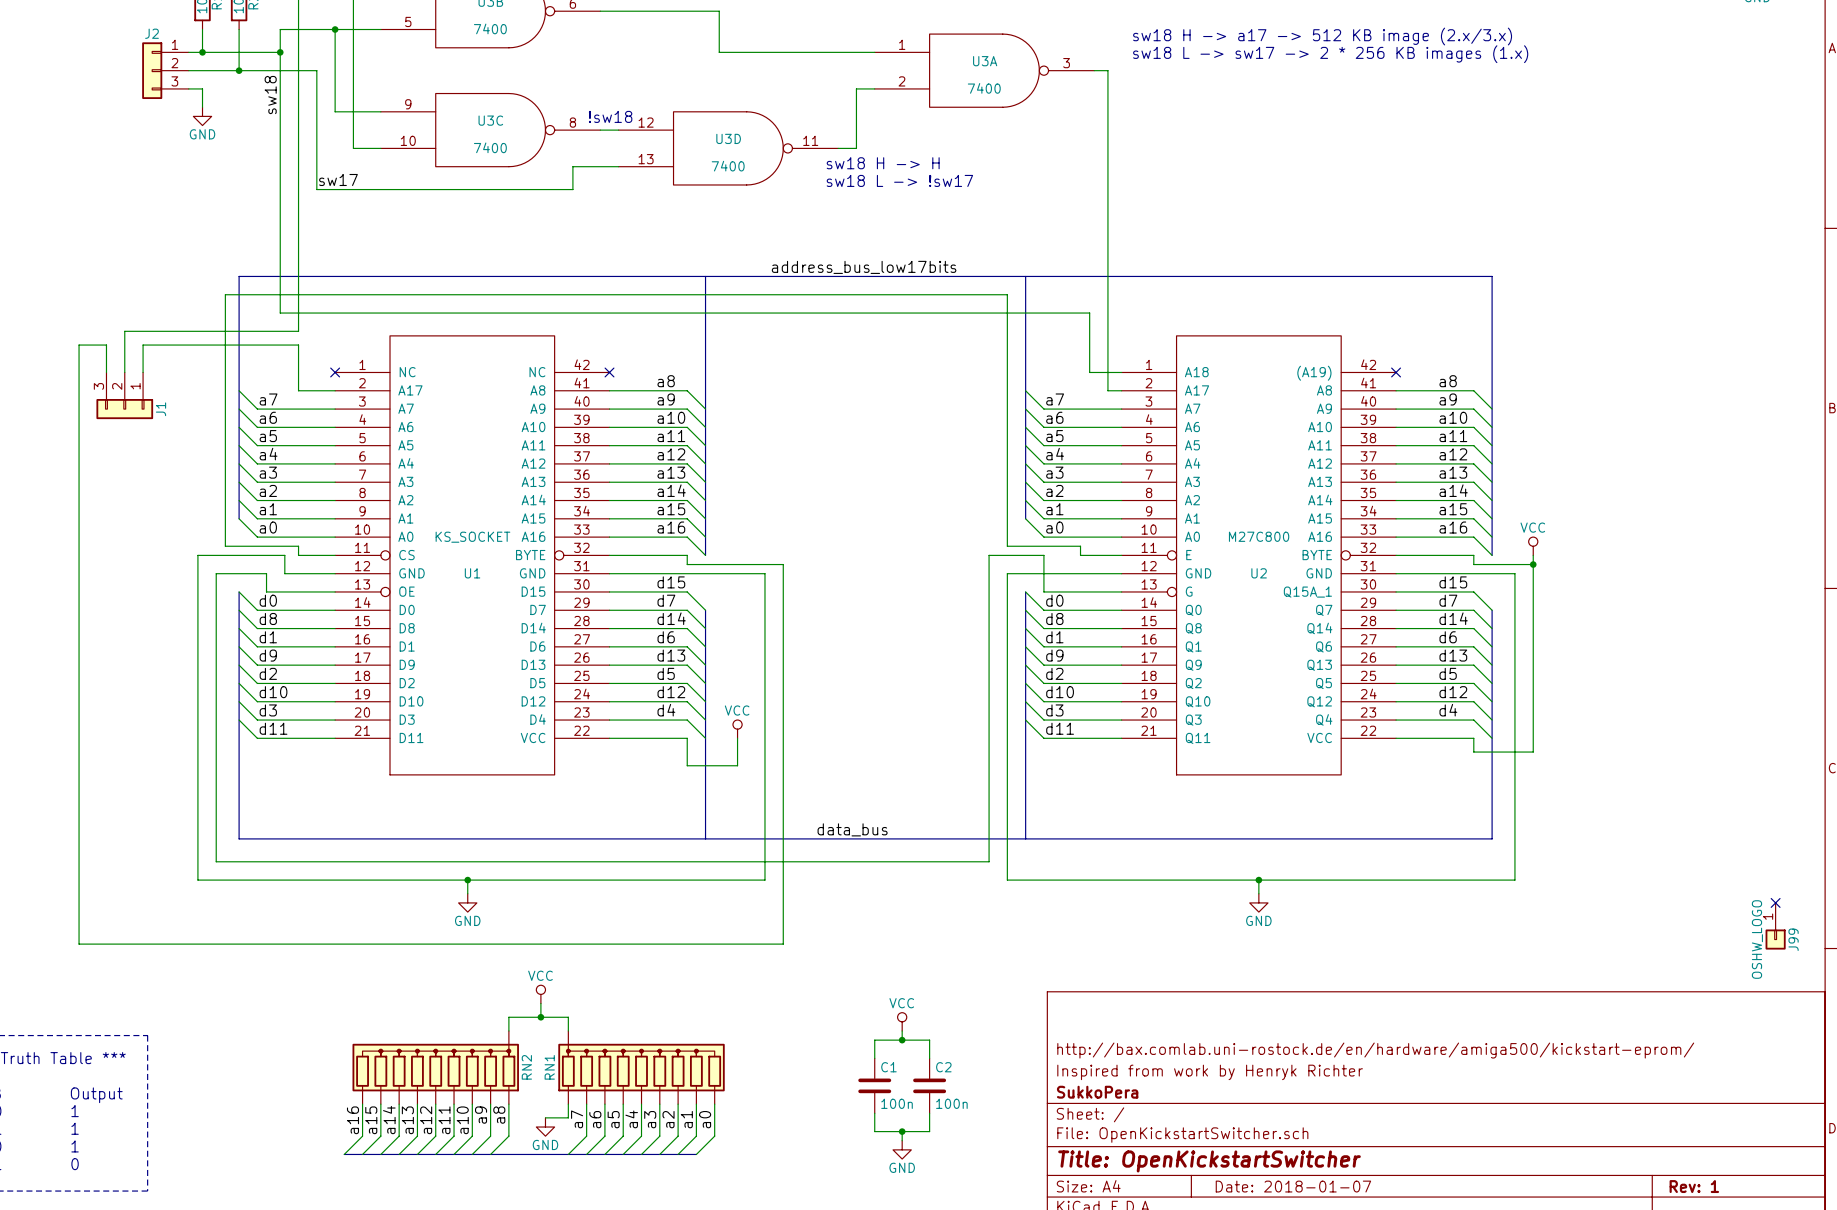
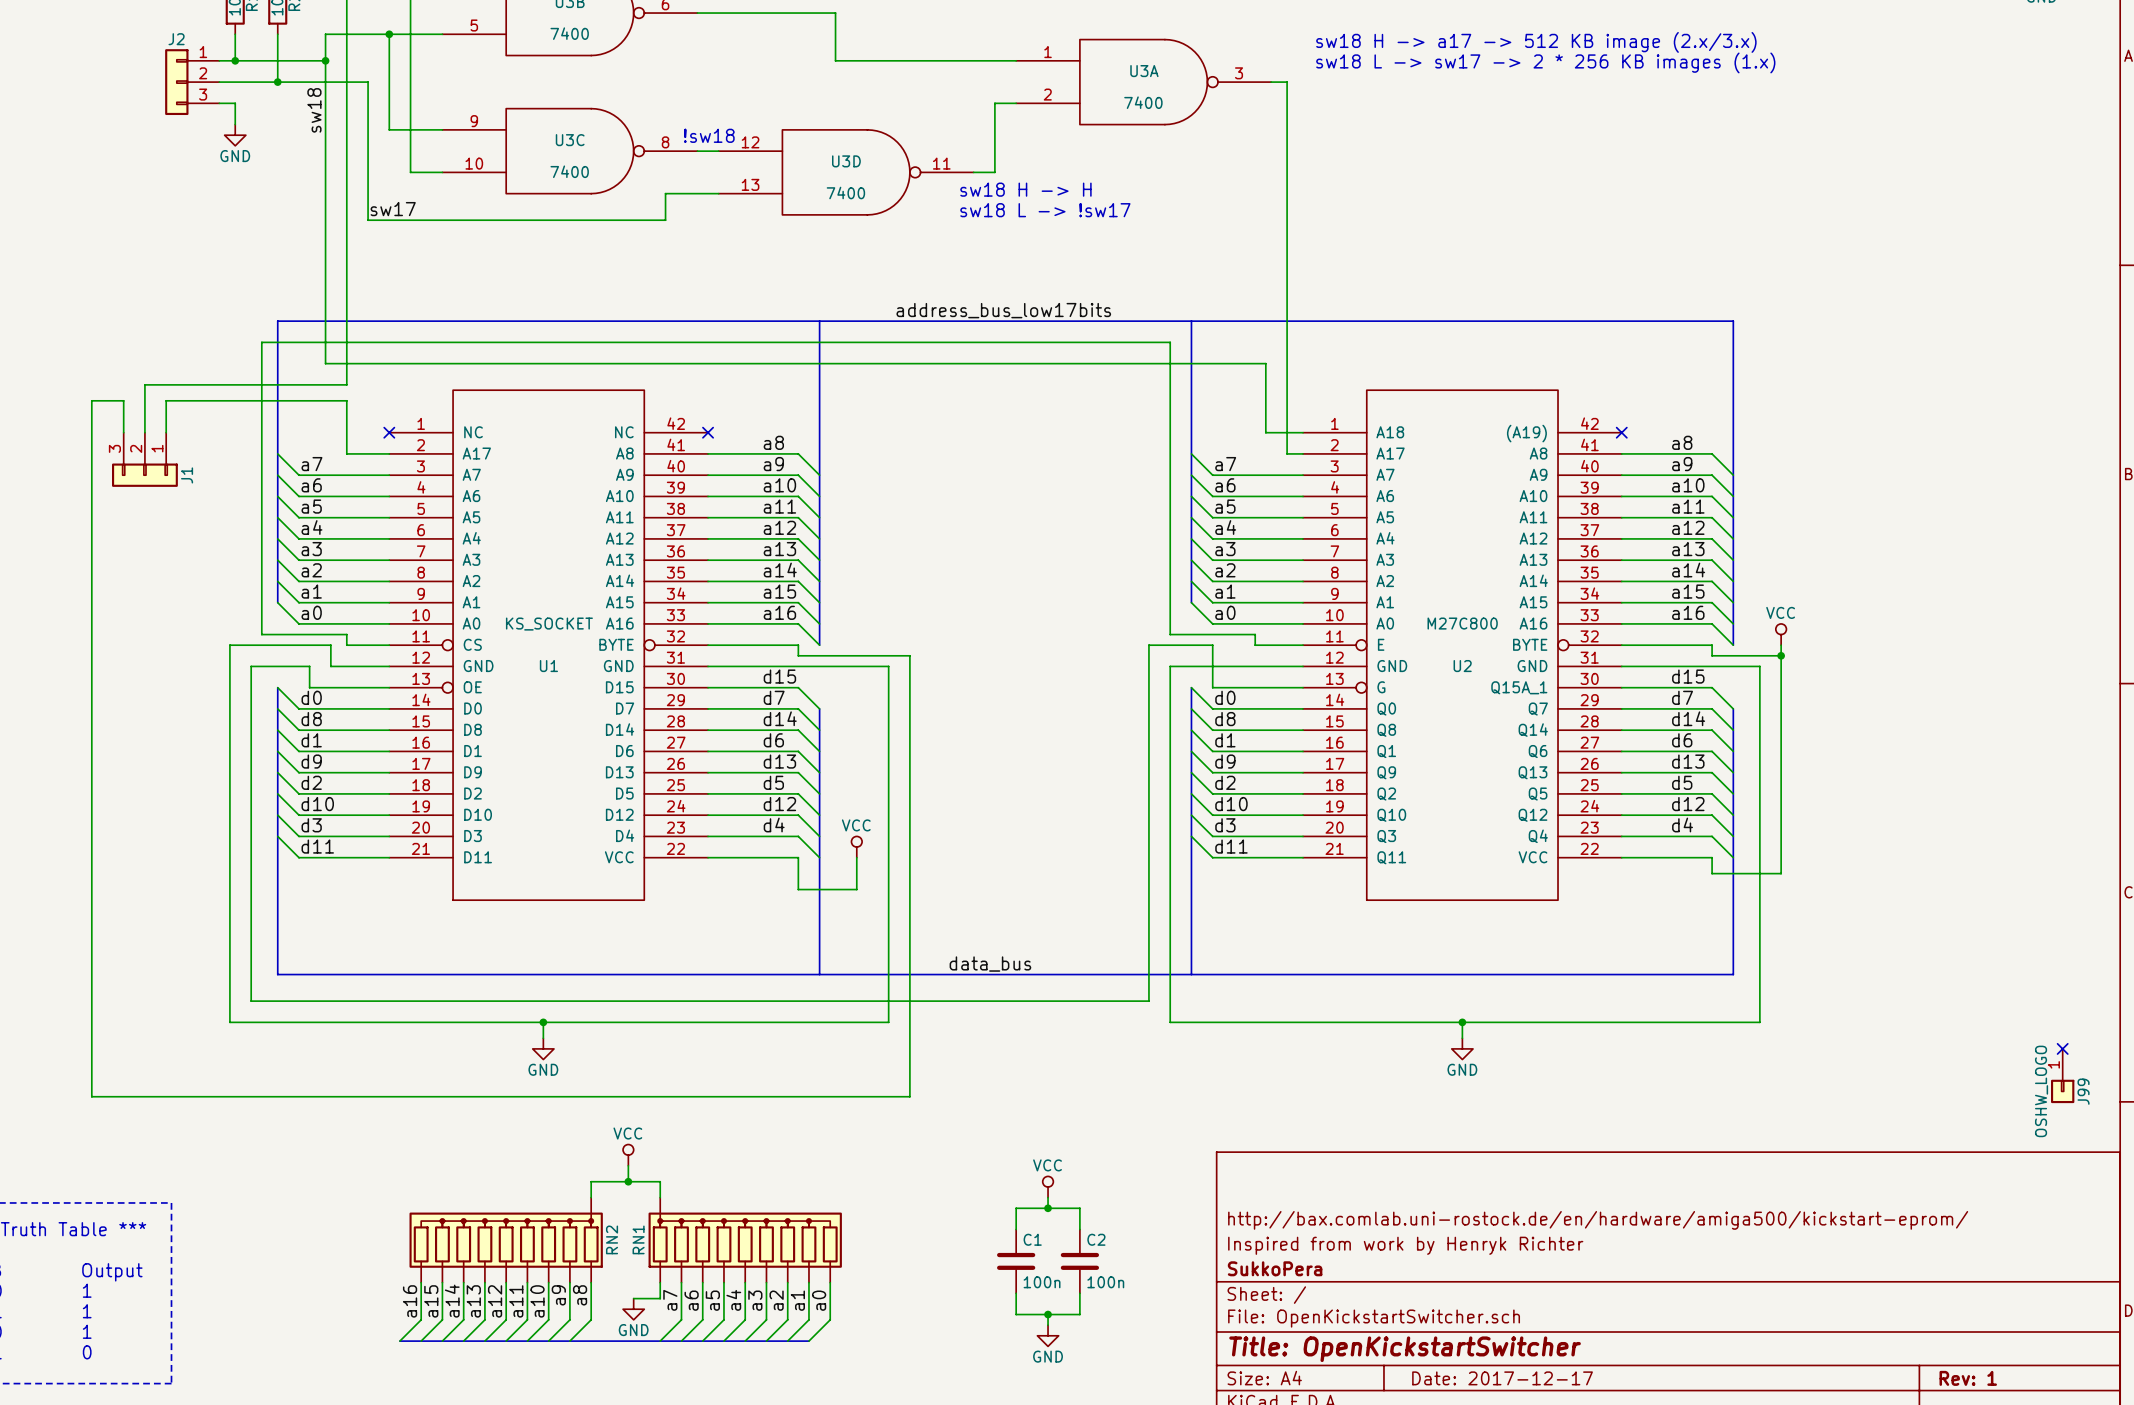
title block: Date: 2018-01-07 (1293, 1186) -> Date: 2017-12-17 (1502, 1378)

